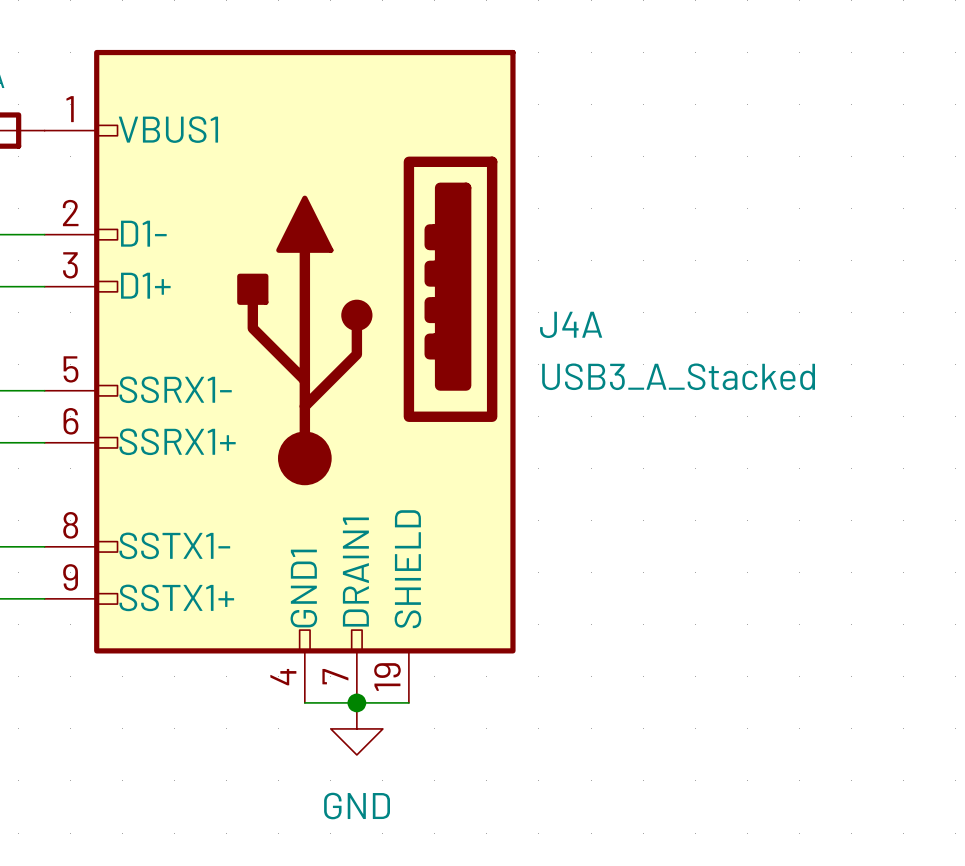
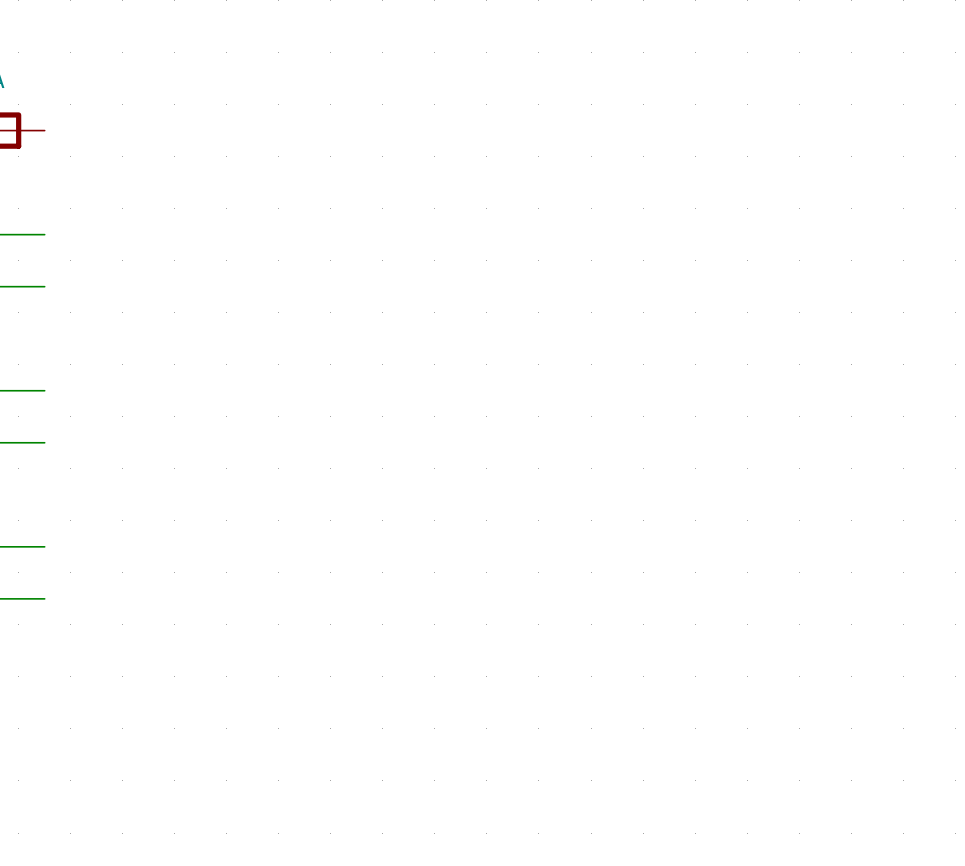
J4A: USB3_A_Stacked (280, 376) -> none
wire: (304, 702) (408, 702) -> none
junction: (356, 702) -> none
power symbol: GND (356, 728) -> none

